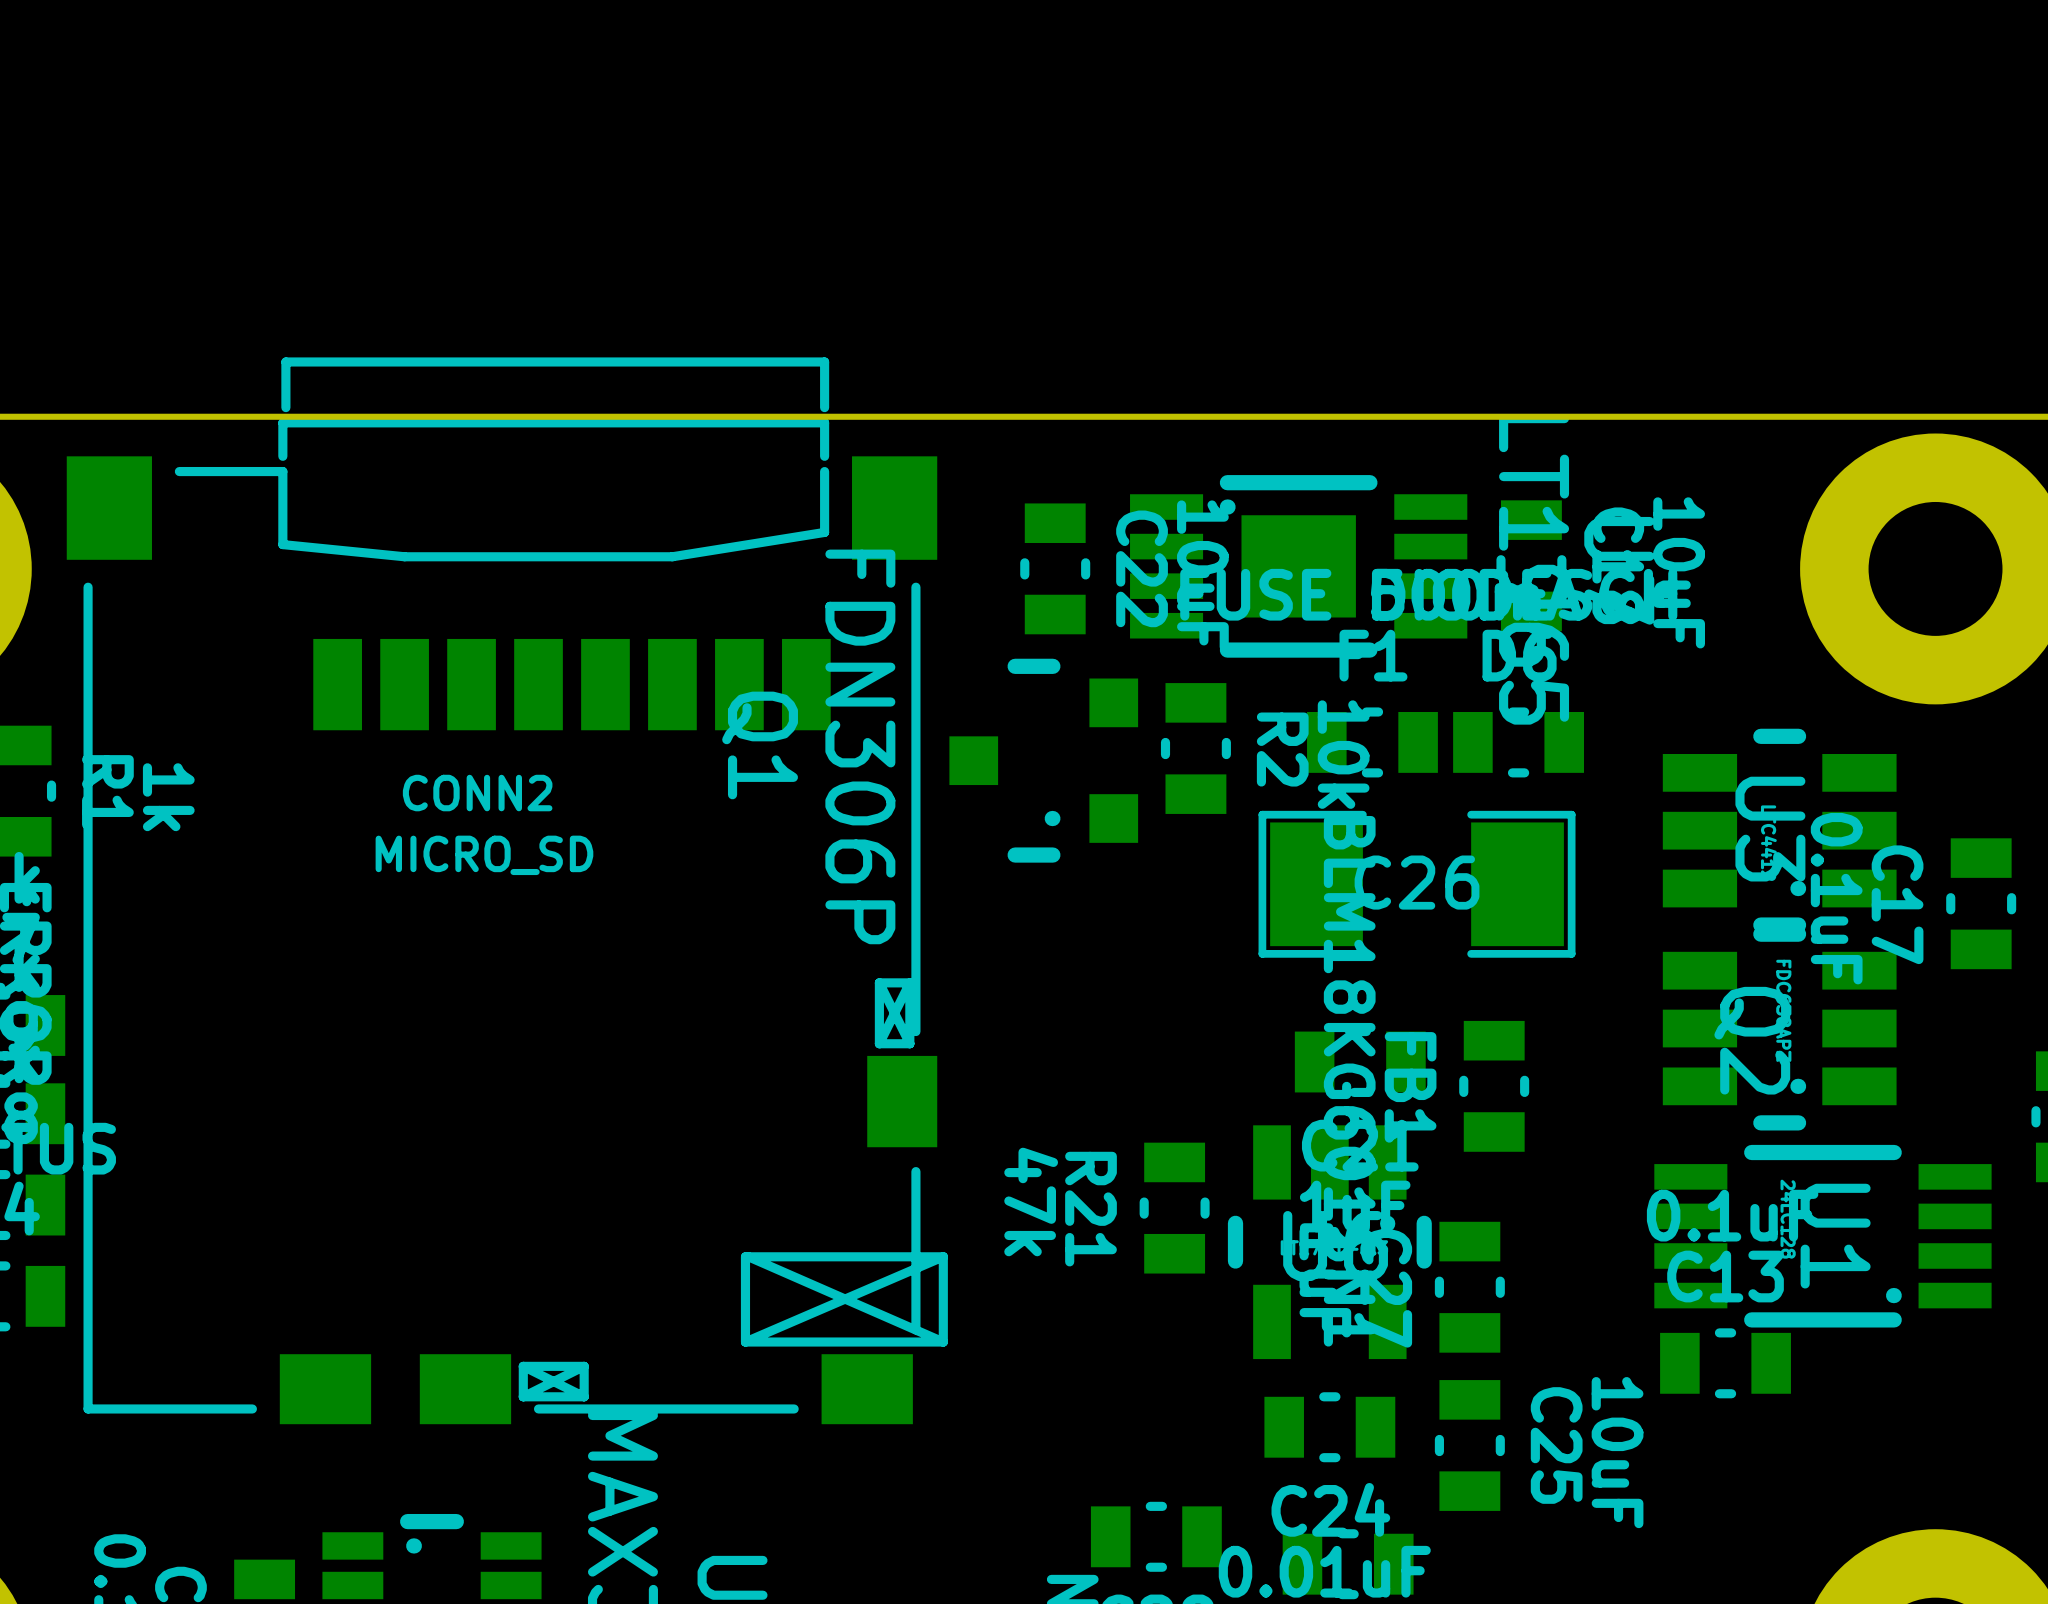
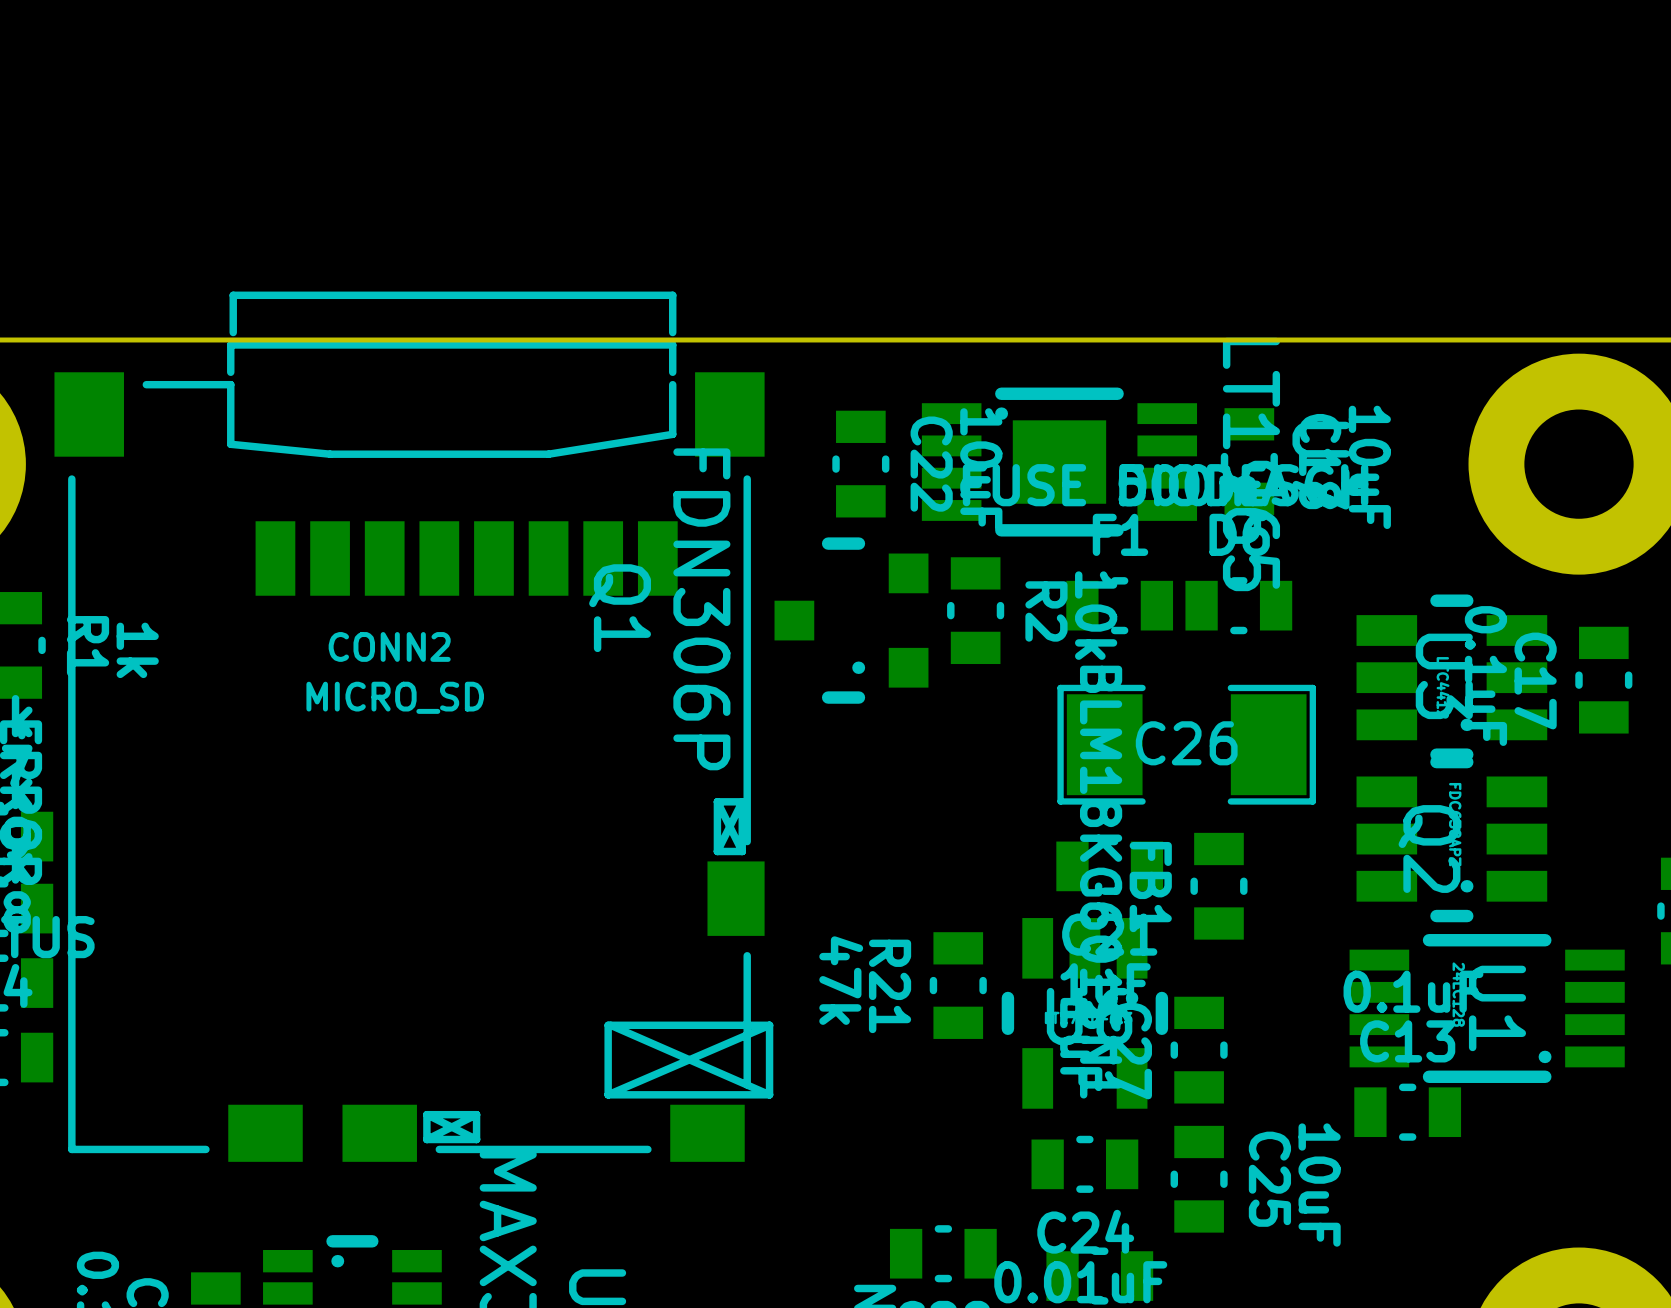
C26 position: (1417, 884) -> (1186, 744)
C17 position: (1981, 903) -> (1603, 680)

